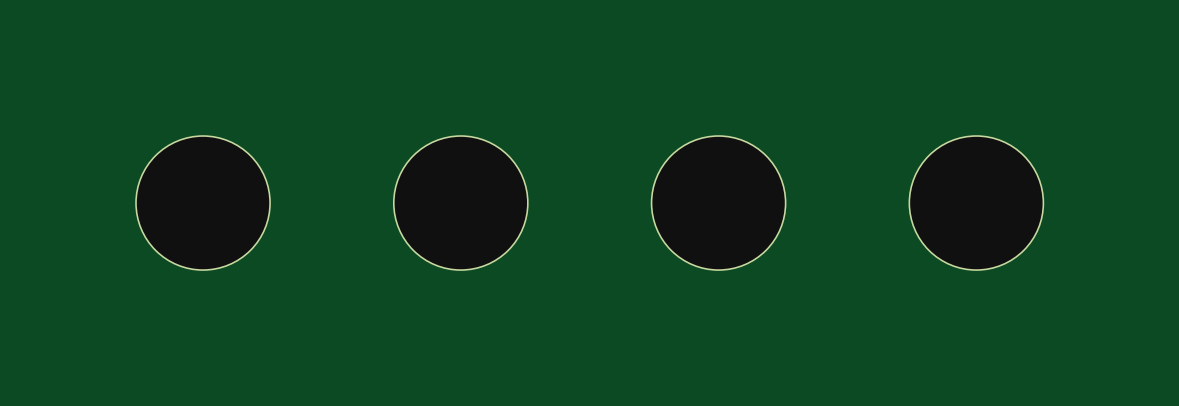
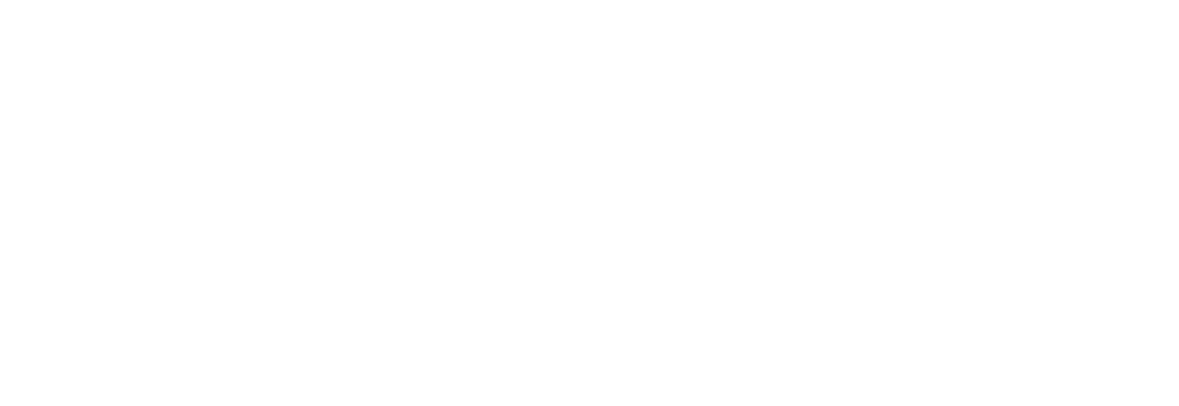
part: (203, 203) -> none
part: (460, 203) -> none
part: (718, 203) -> none
part: (976, 203) -> none

